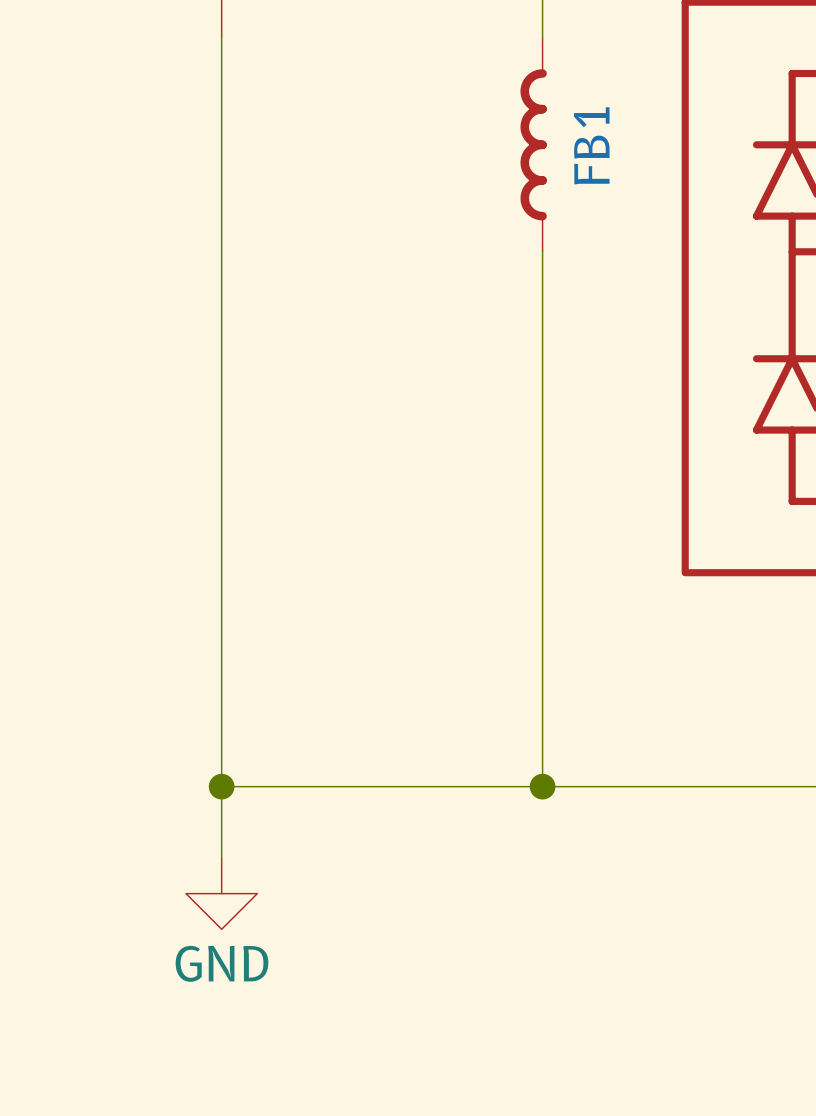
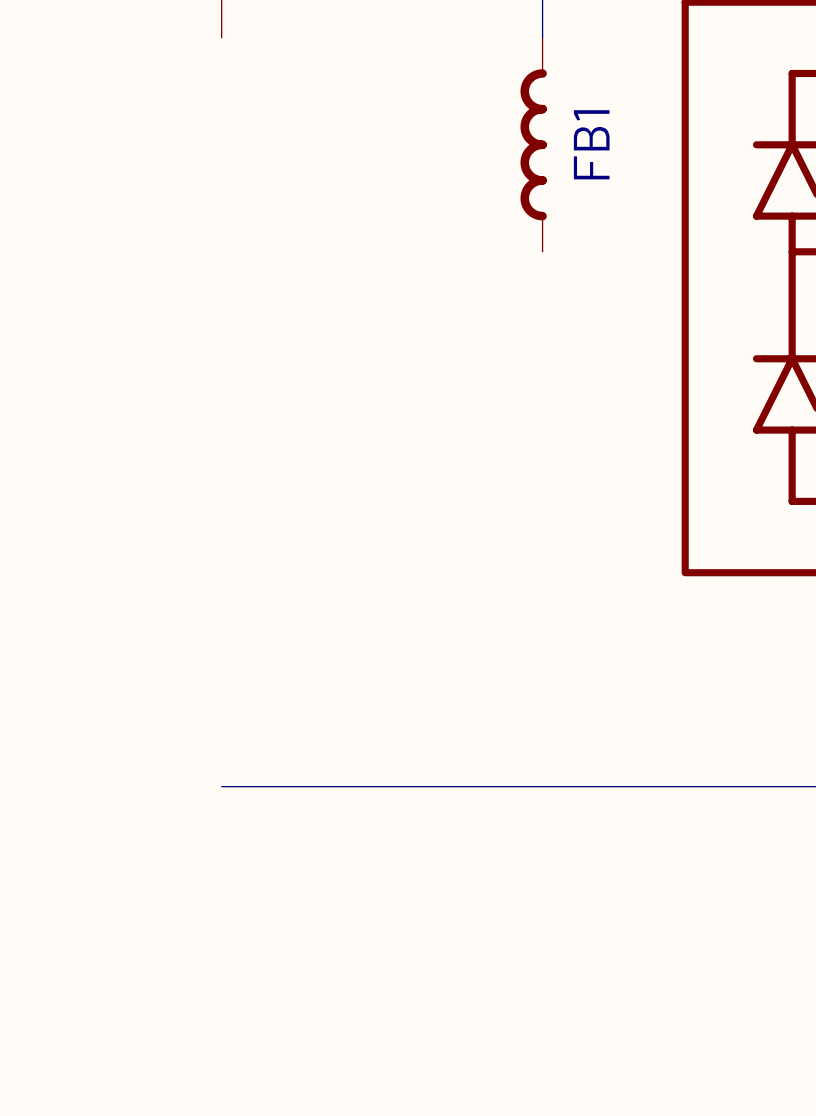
wire: (221, 37) (221, 857) -> none
wire: (542, 251) (542, 786) -> none
junction: (221, 786) -> none
junction: (542, 786) -> none
power symbol: GND (221, 893) -> none

